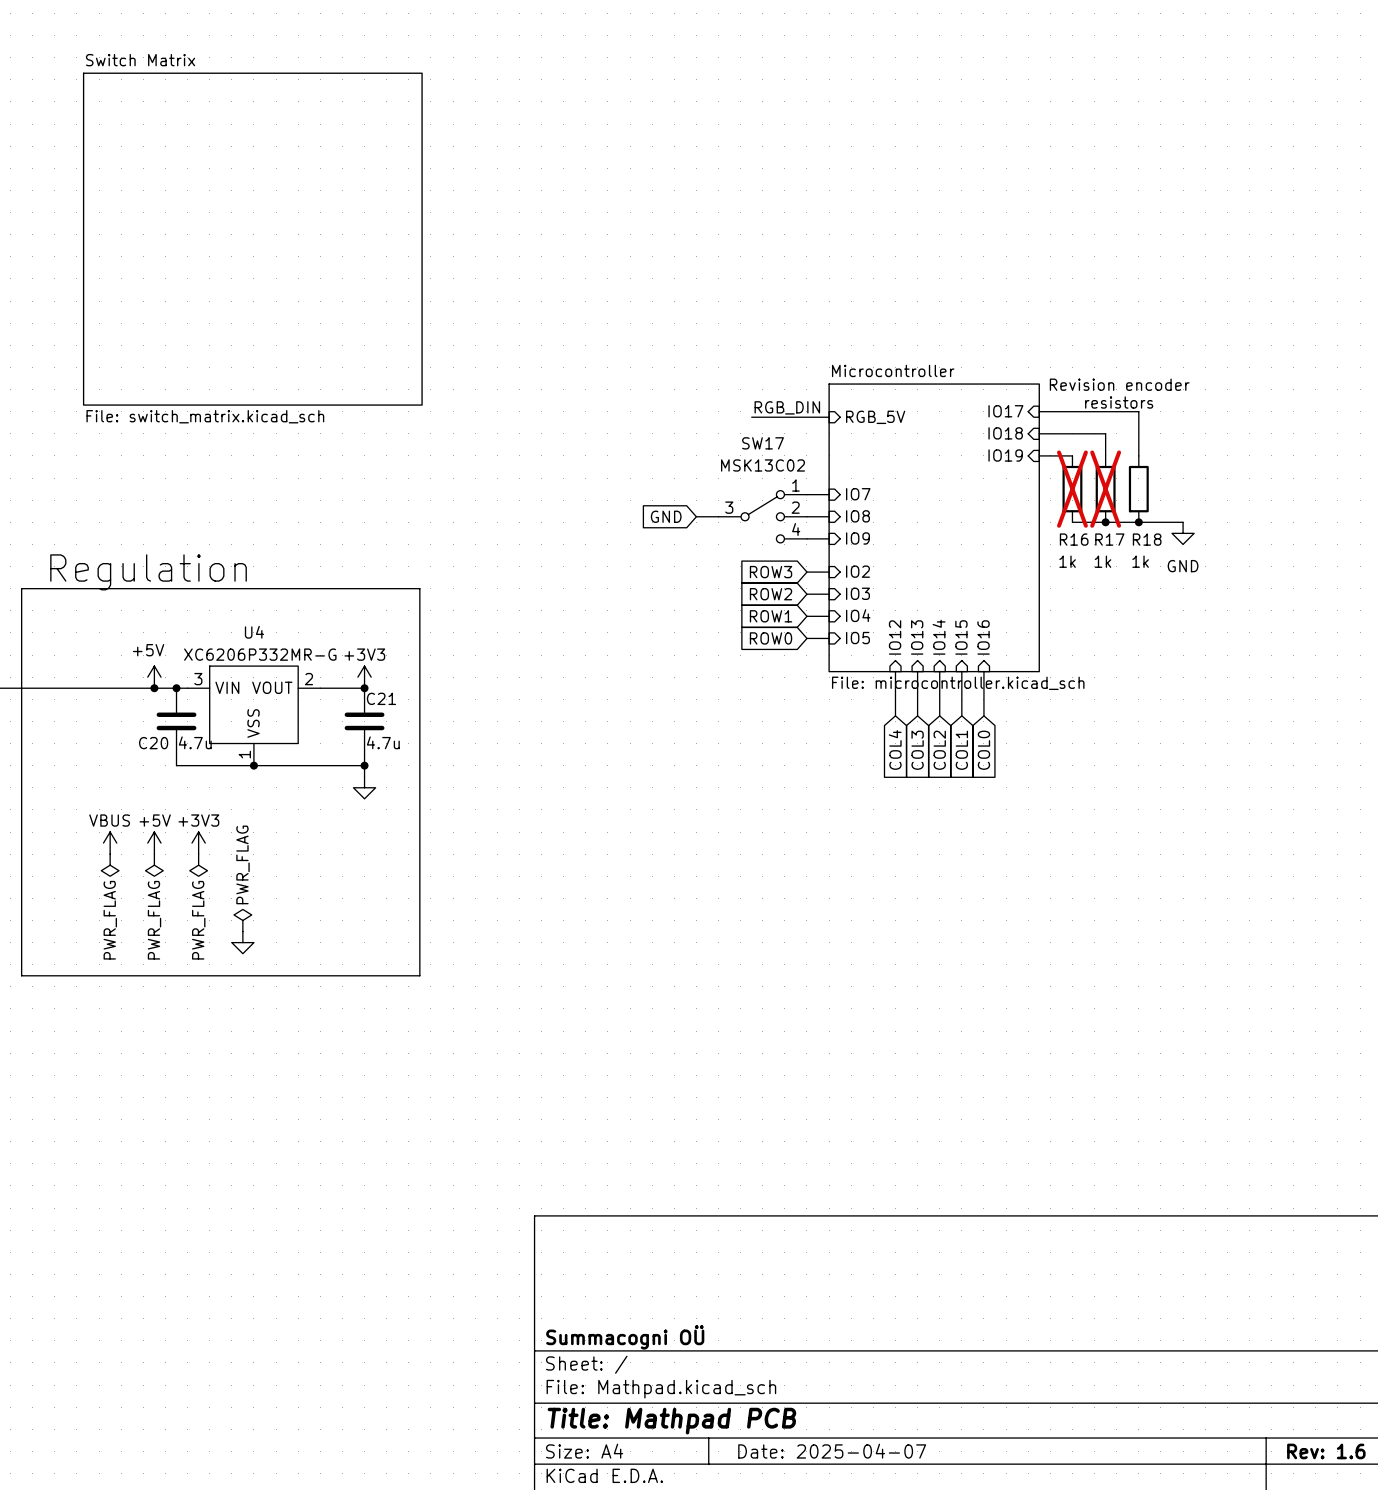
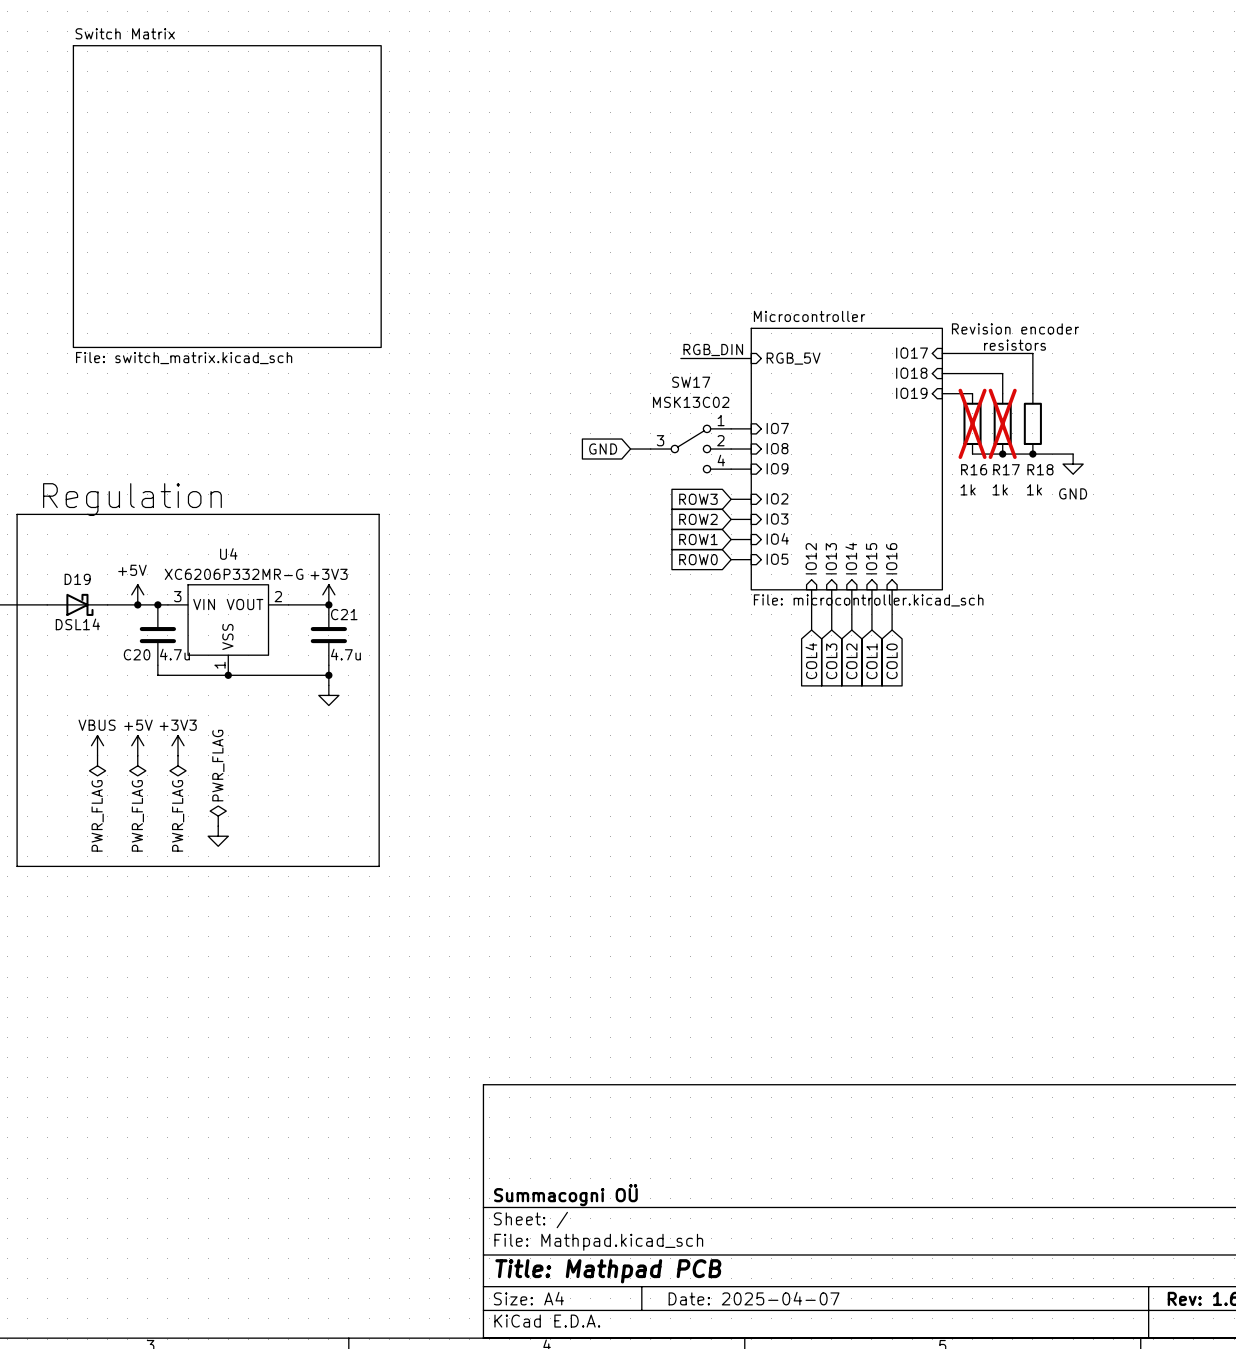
D19: none -> DSL14 (77, 604)

